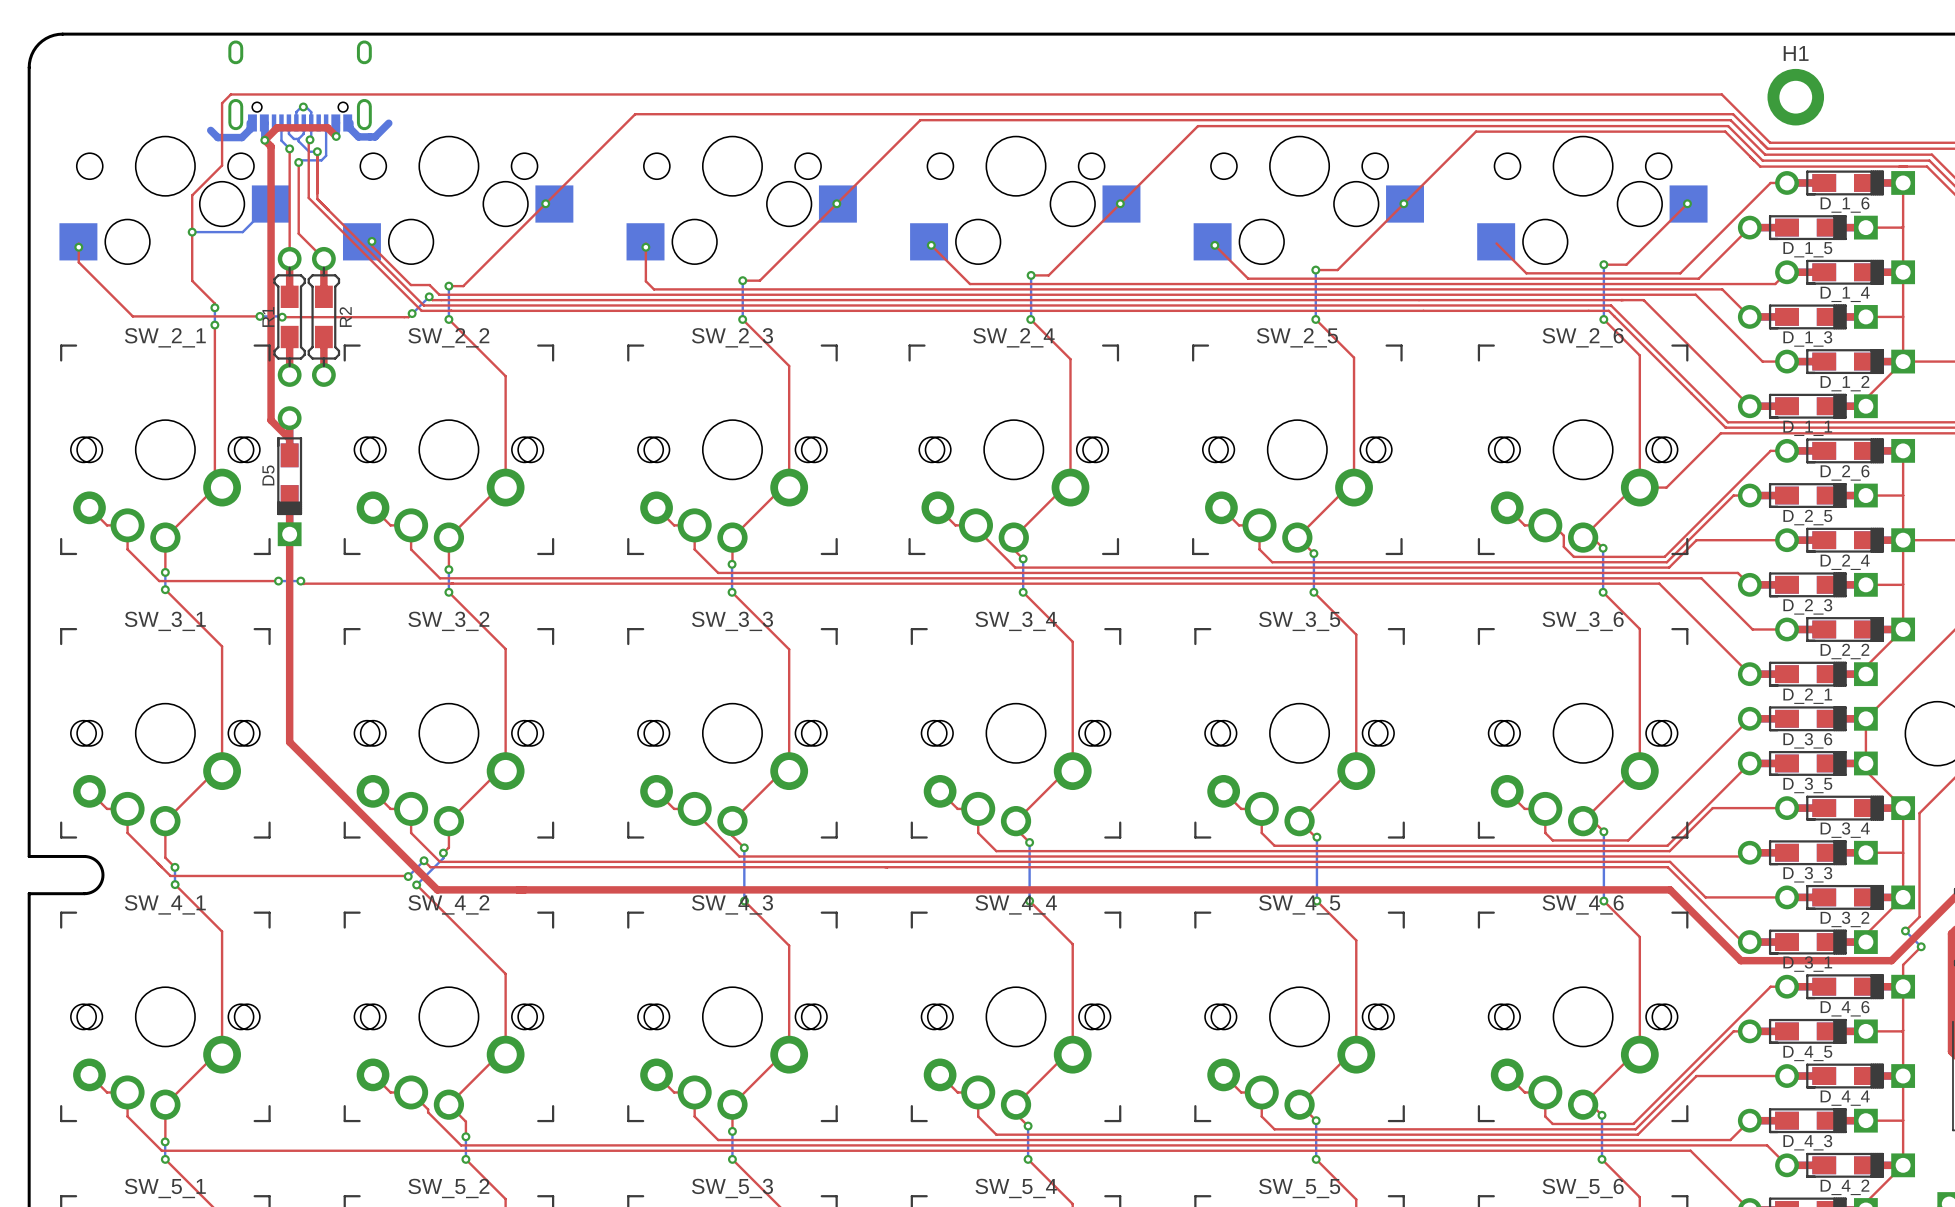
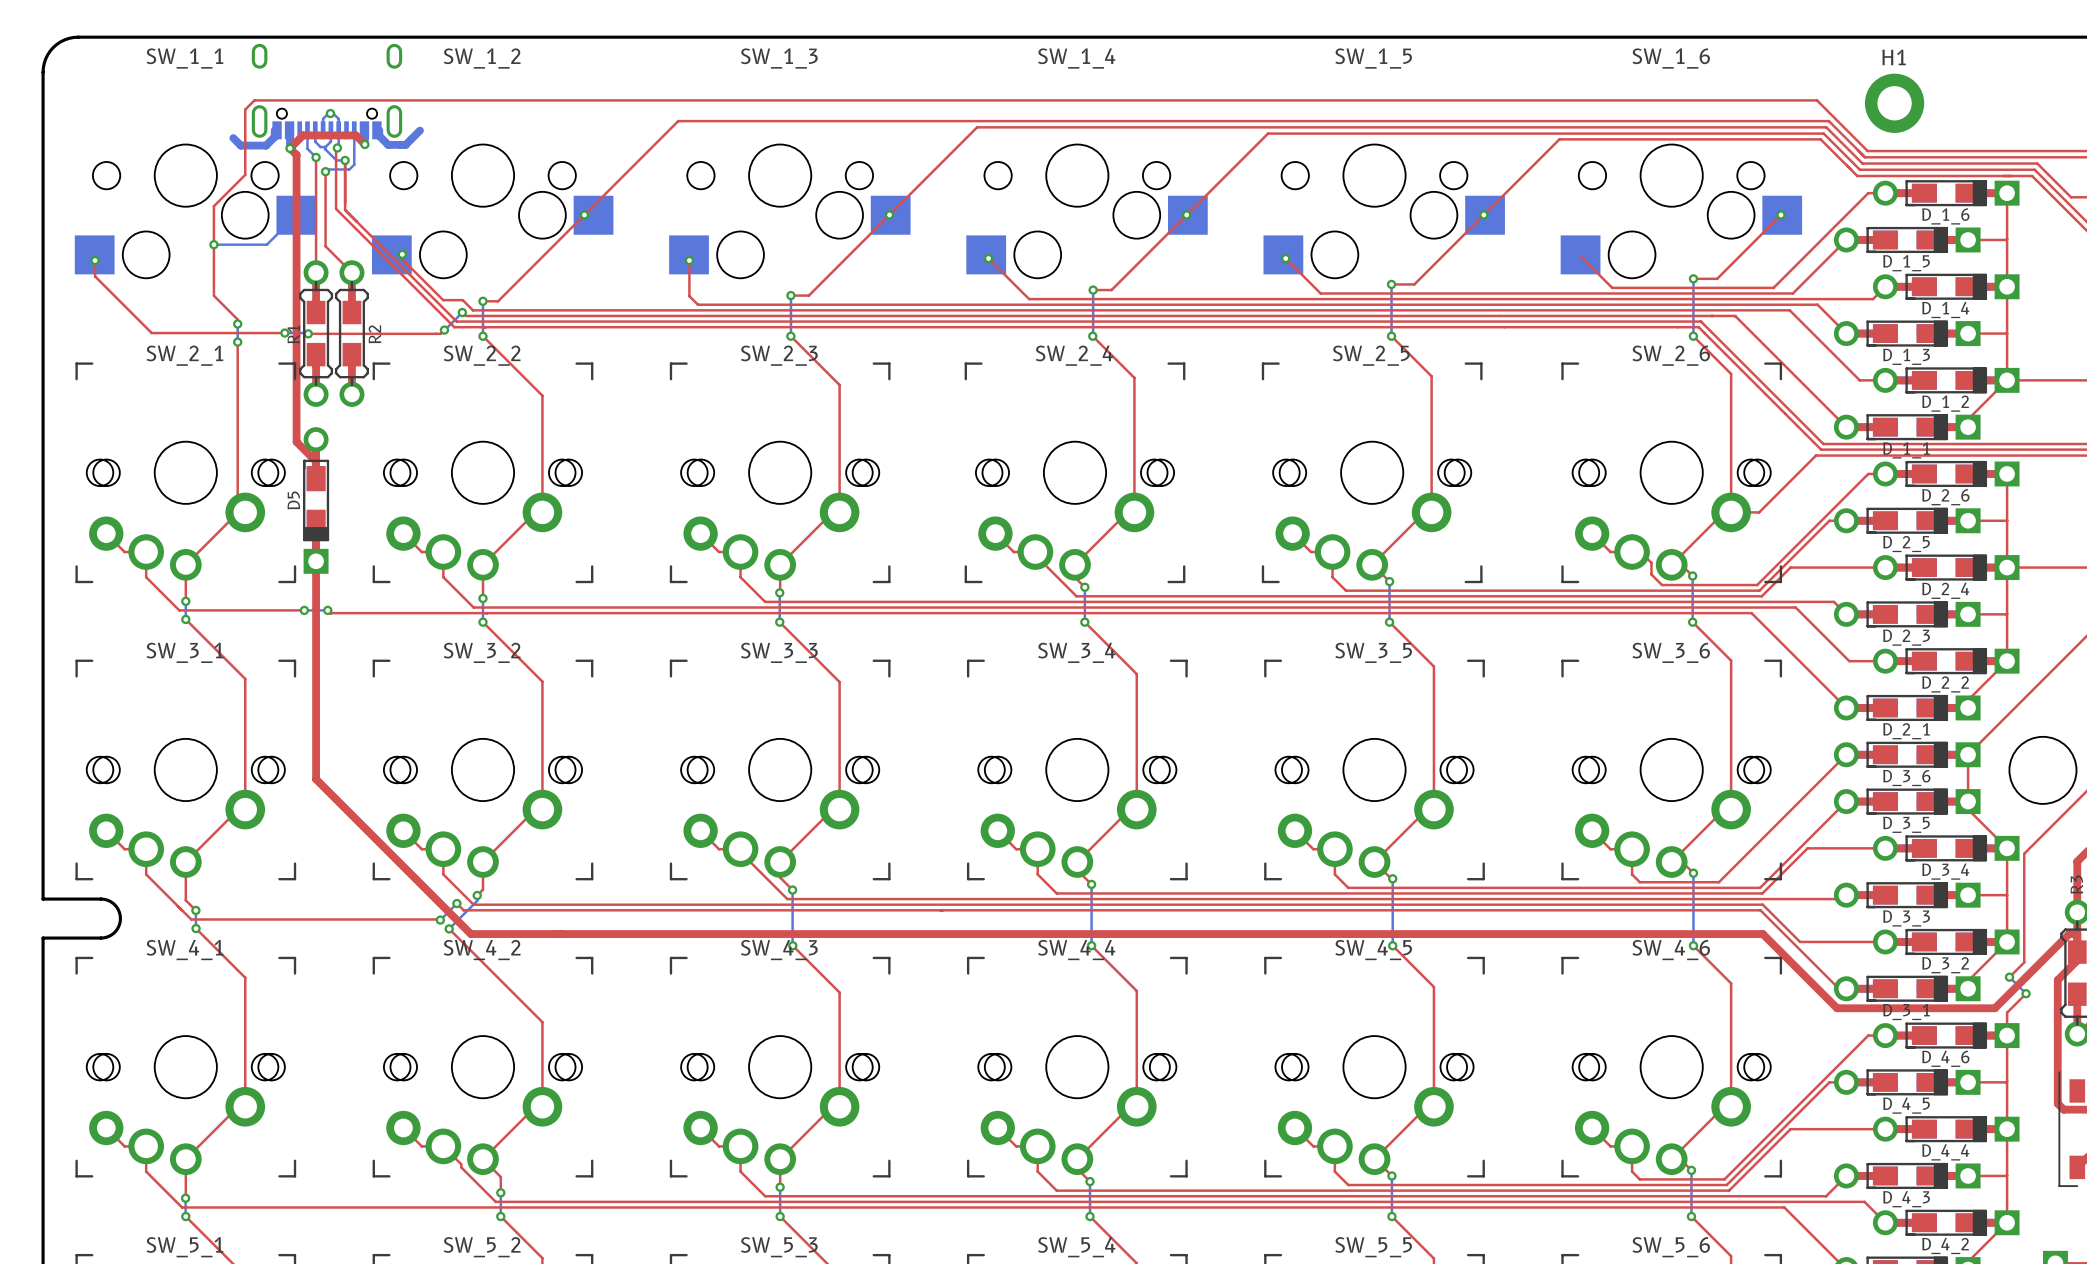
SW_1_1 name: none -> SW_1_1 (184, 58)
SW_1_2 name: none -> SW_1_2 (482, 58)
SW_1_3 name: none -> SW_1_3 (779, 58)
SW_1_4 name: none -> SW_1_4 (1076, 58)
SW_1_5 name: none -> SW_1_5 (1373, 58)
SW_1_6 name: none -> SW_1_6 (1671, 58)

